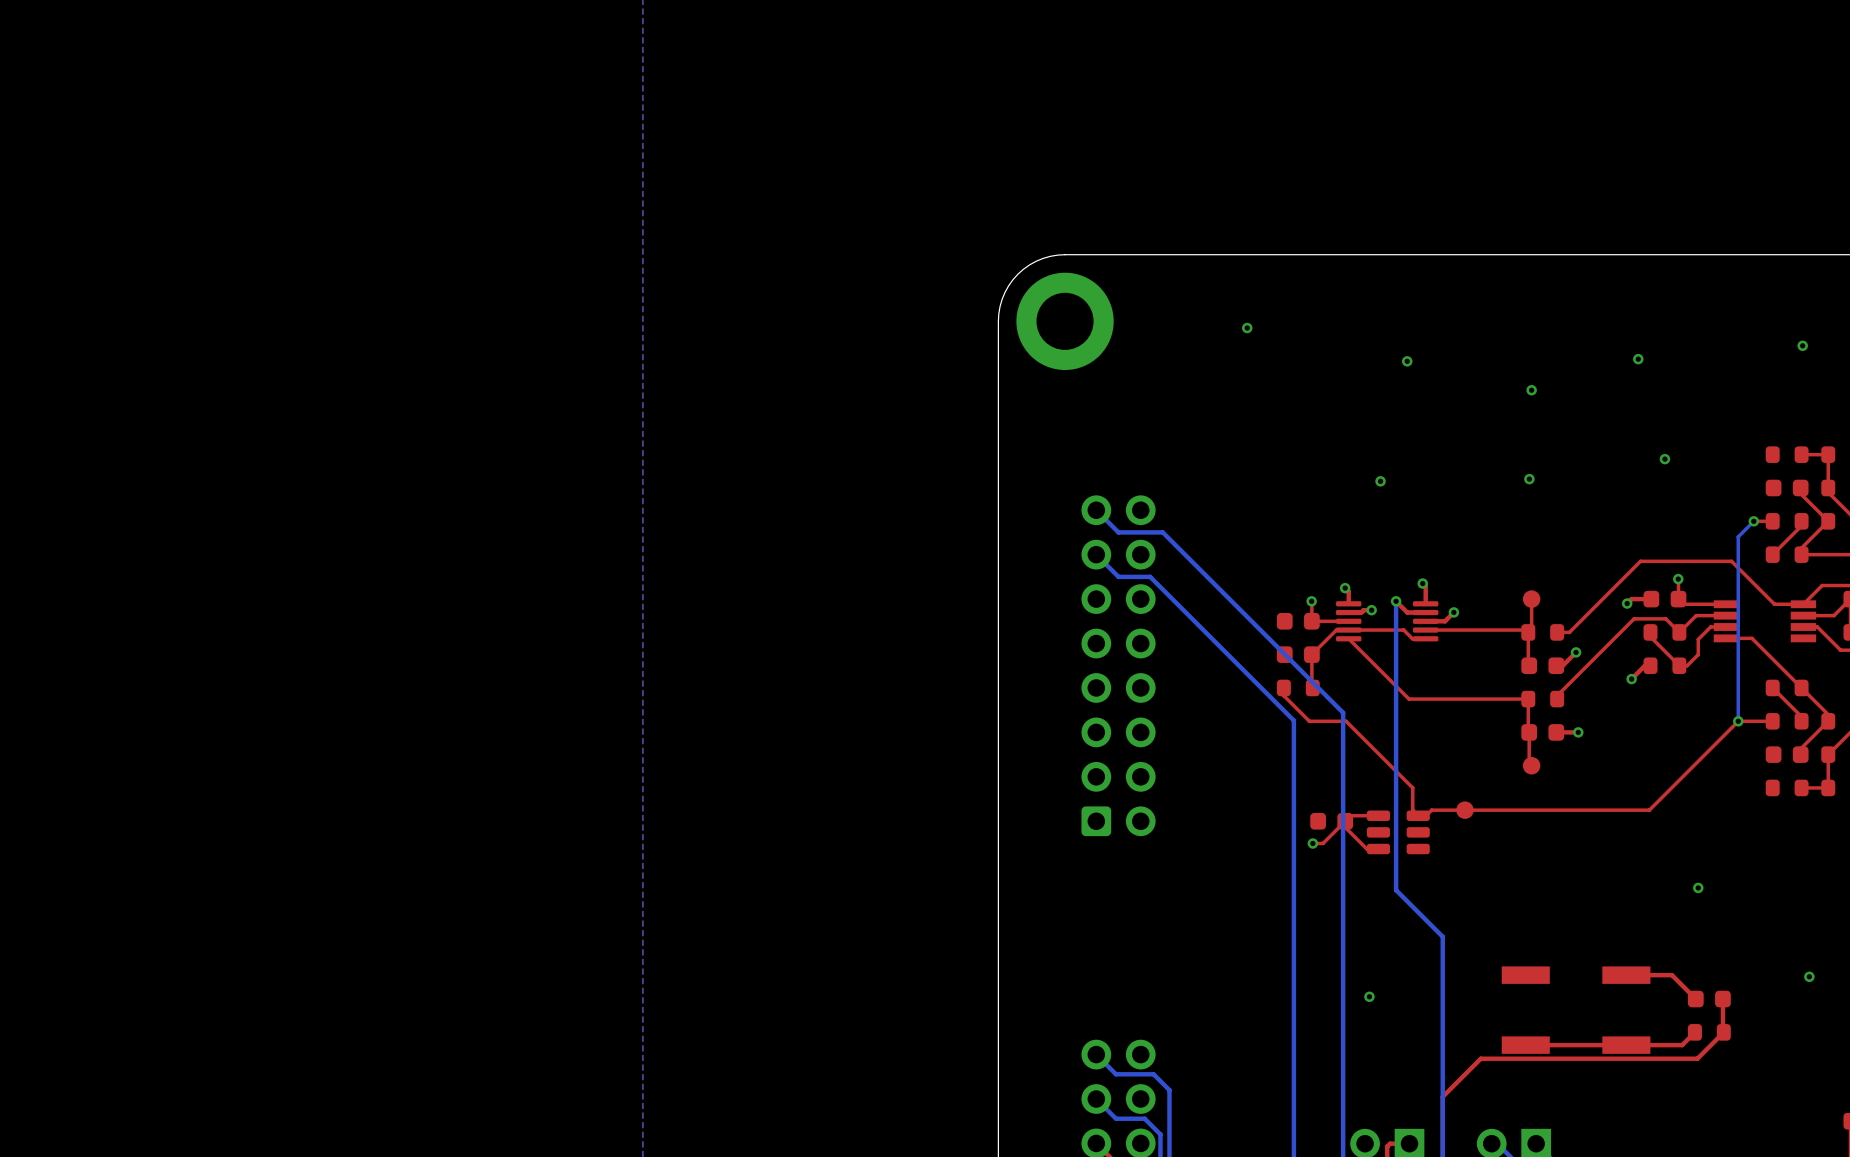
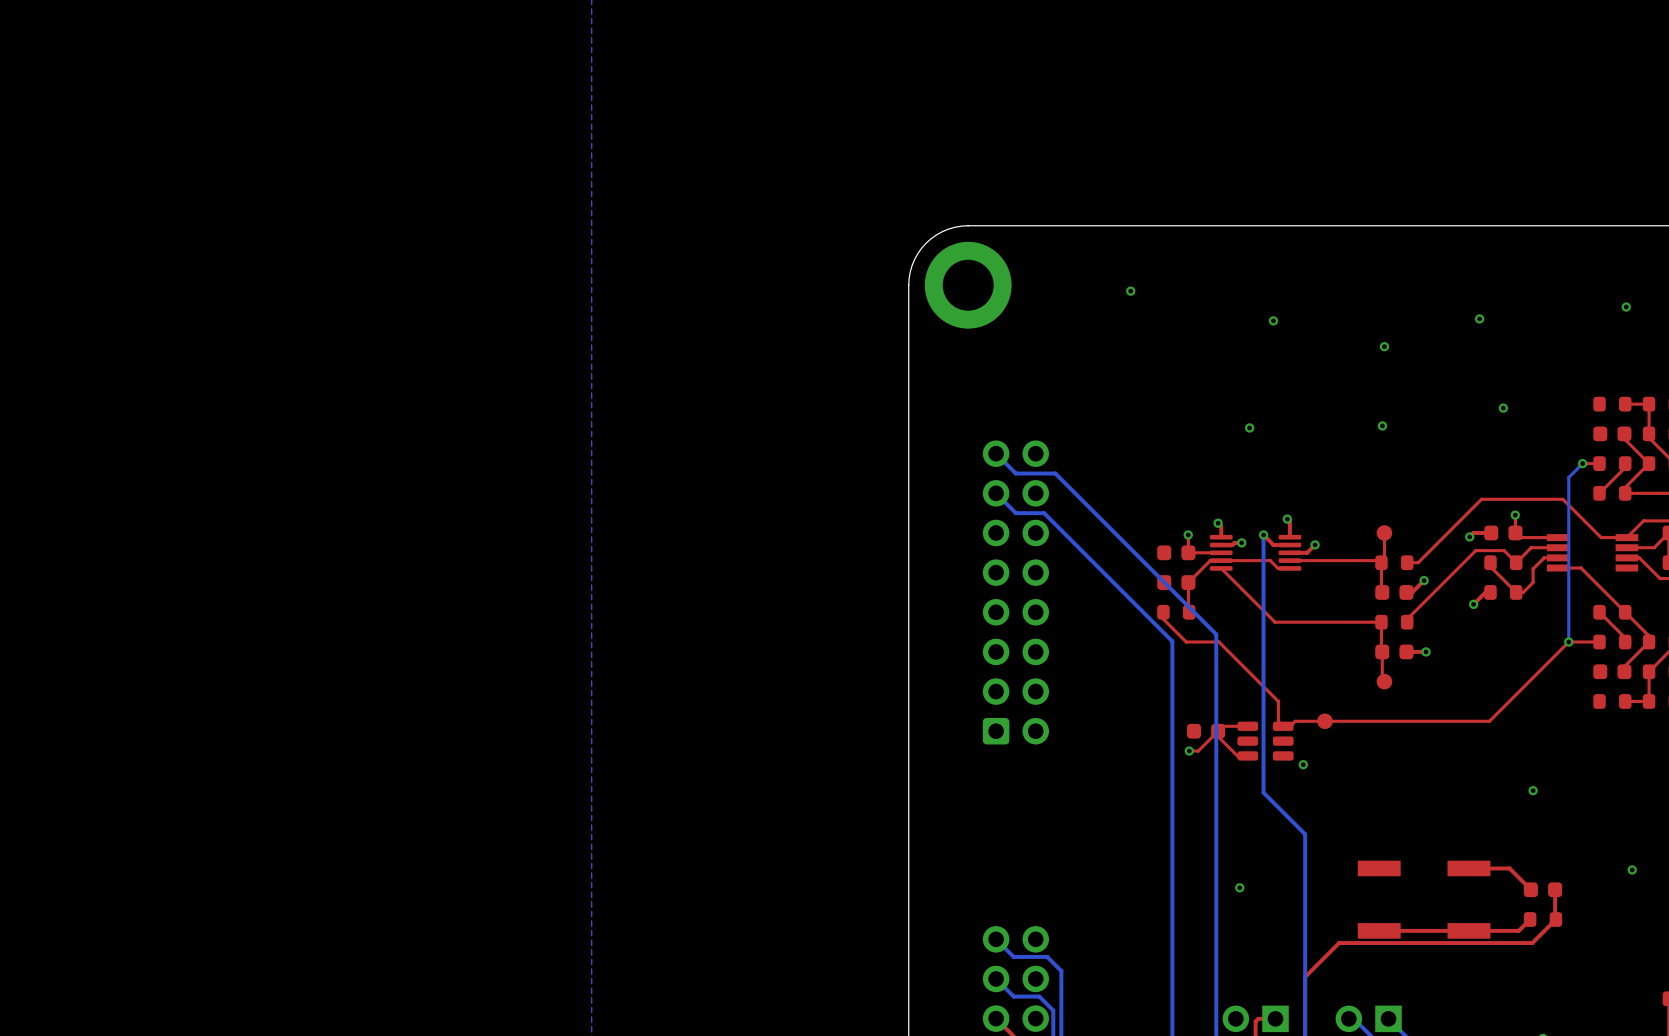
via: none -> (1303, 764)

